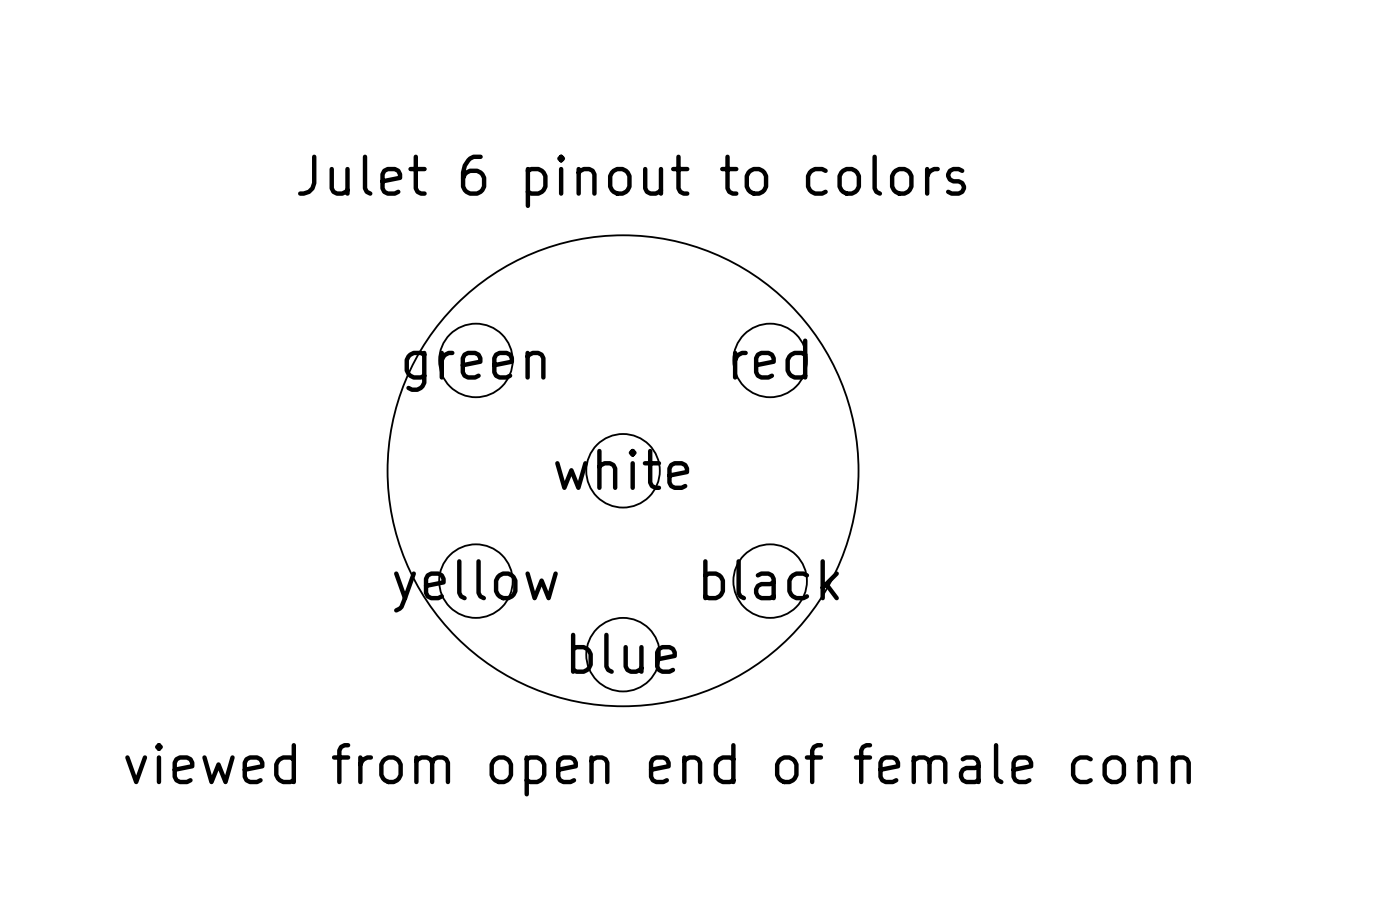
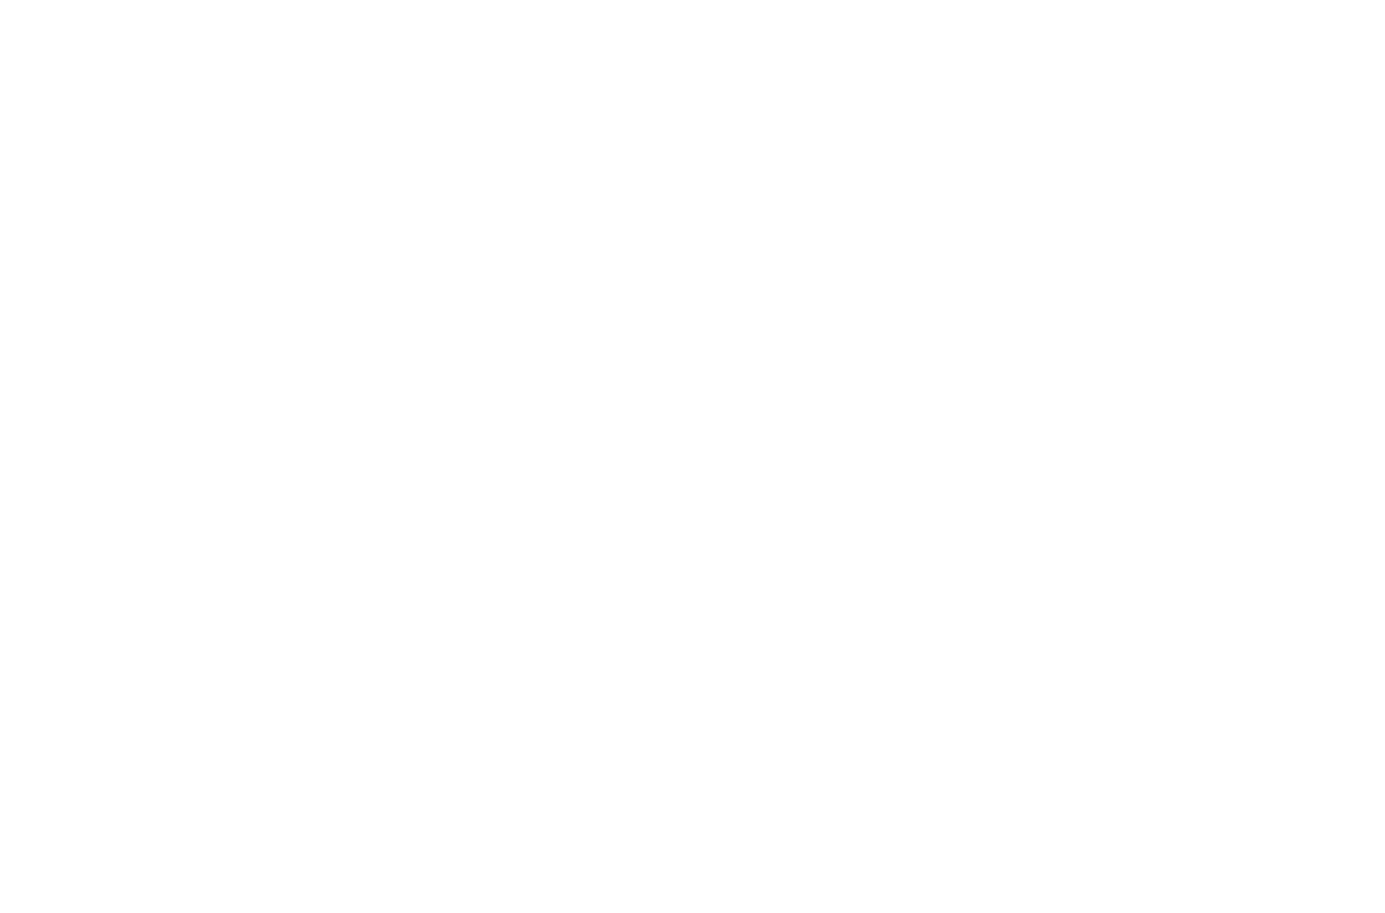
part: Julet 6 pinout to colors (623, 470) -> none

